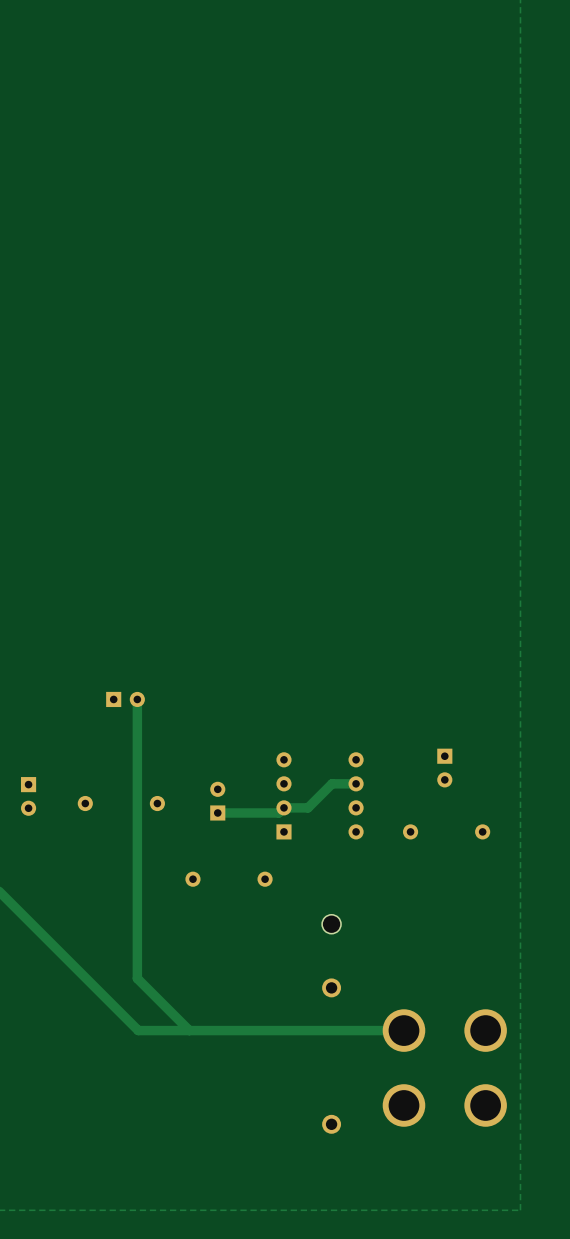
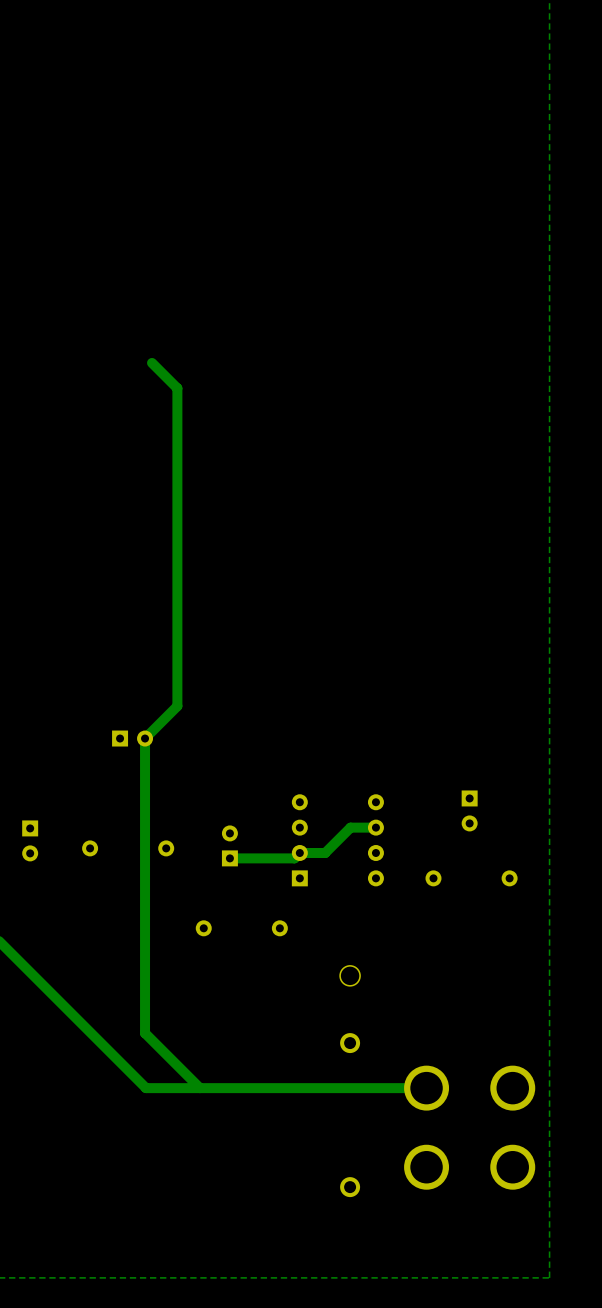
track: none -> (152, 362) (177, 388) (177, 706) (145, 738)

